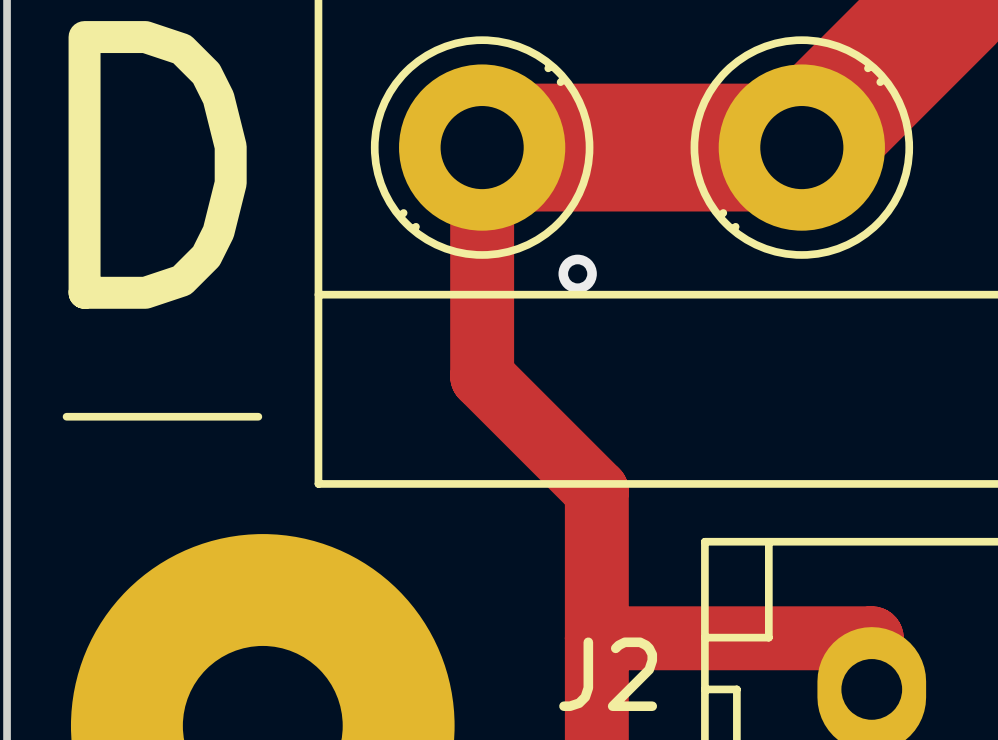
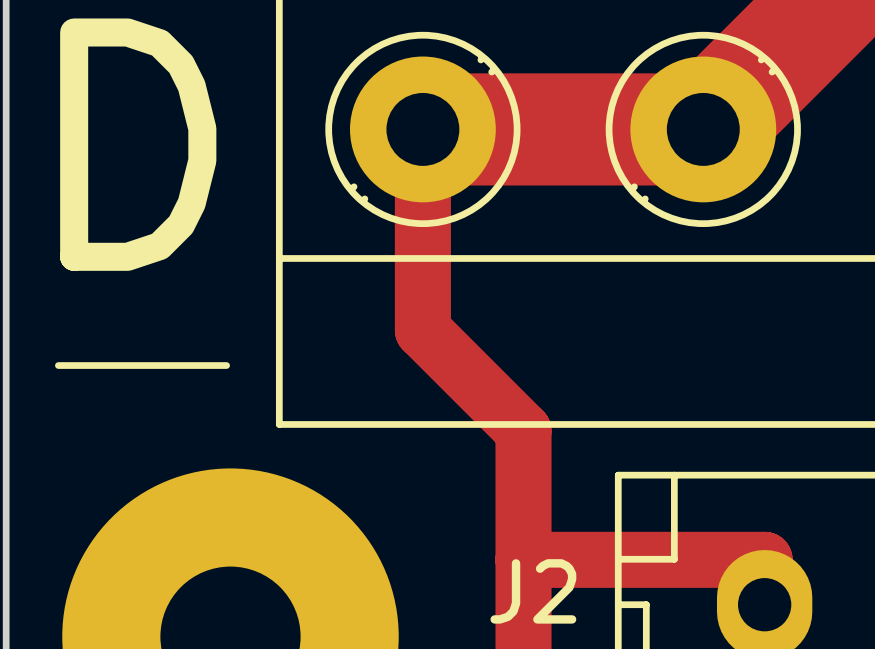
via: (577, 273) -> none

